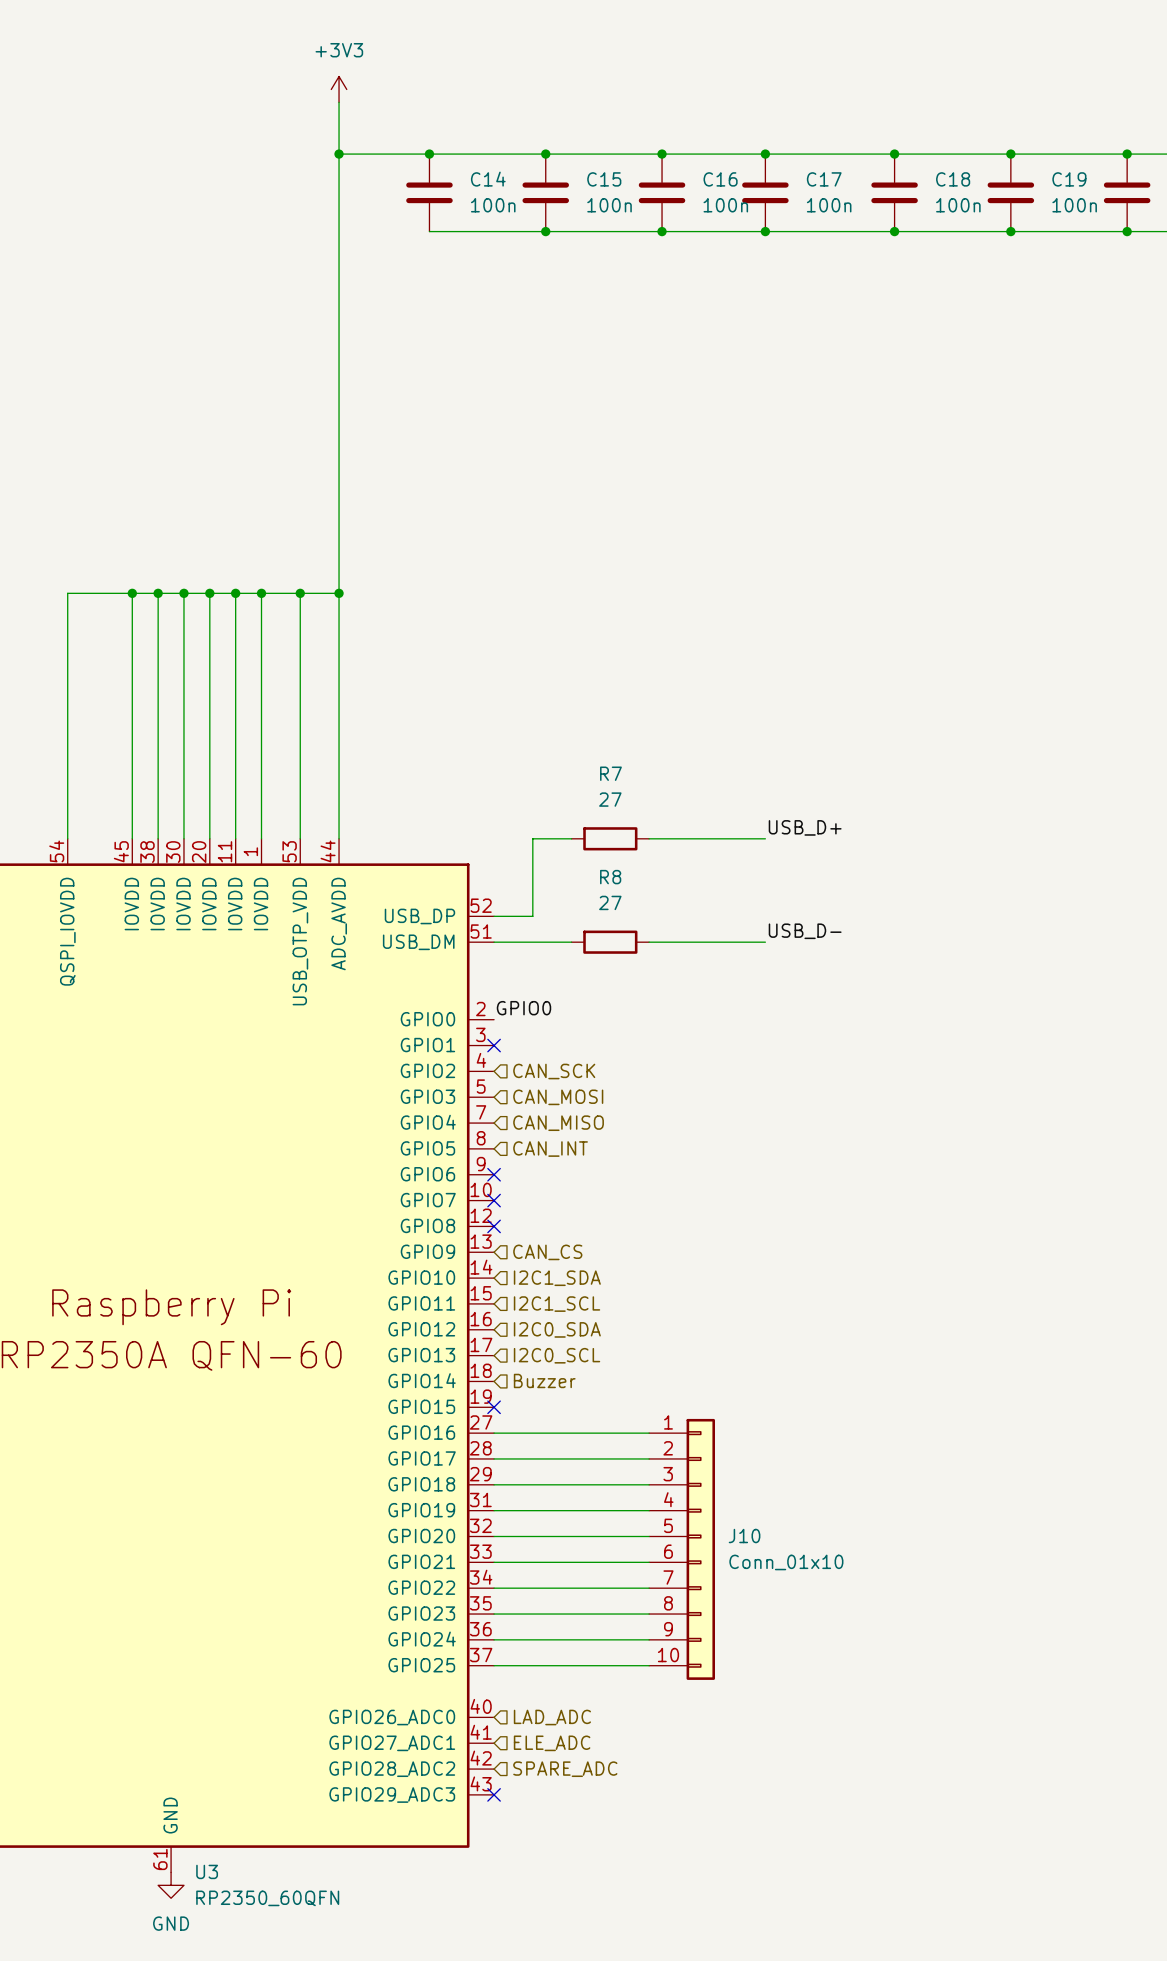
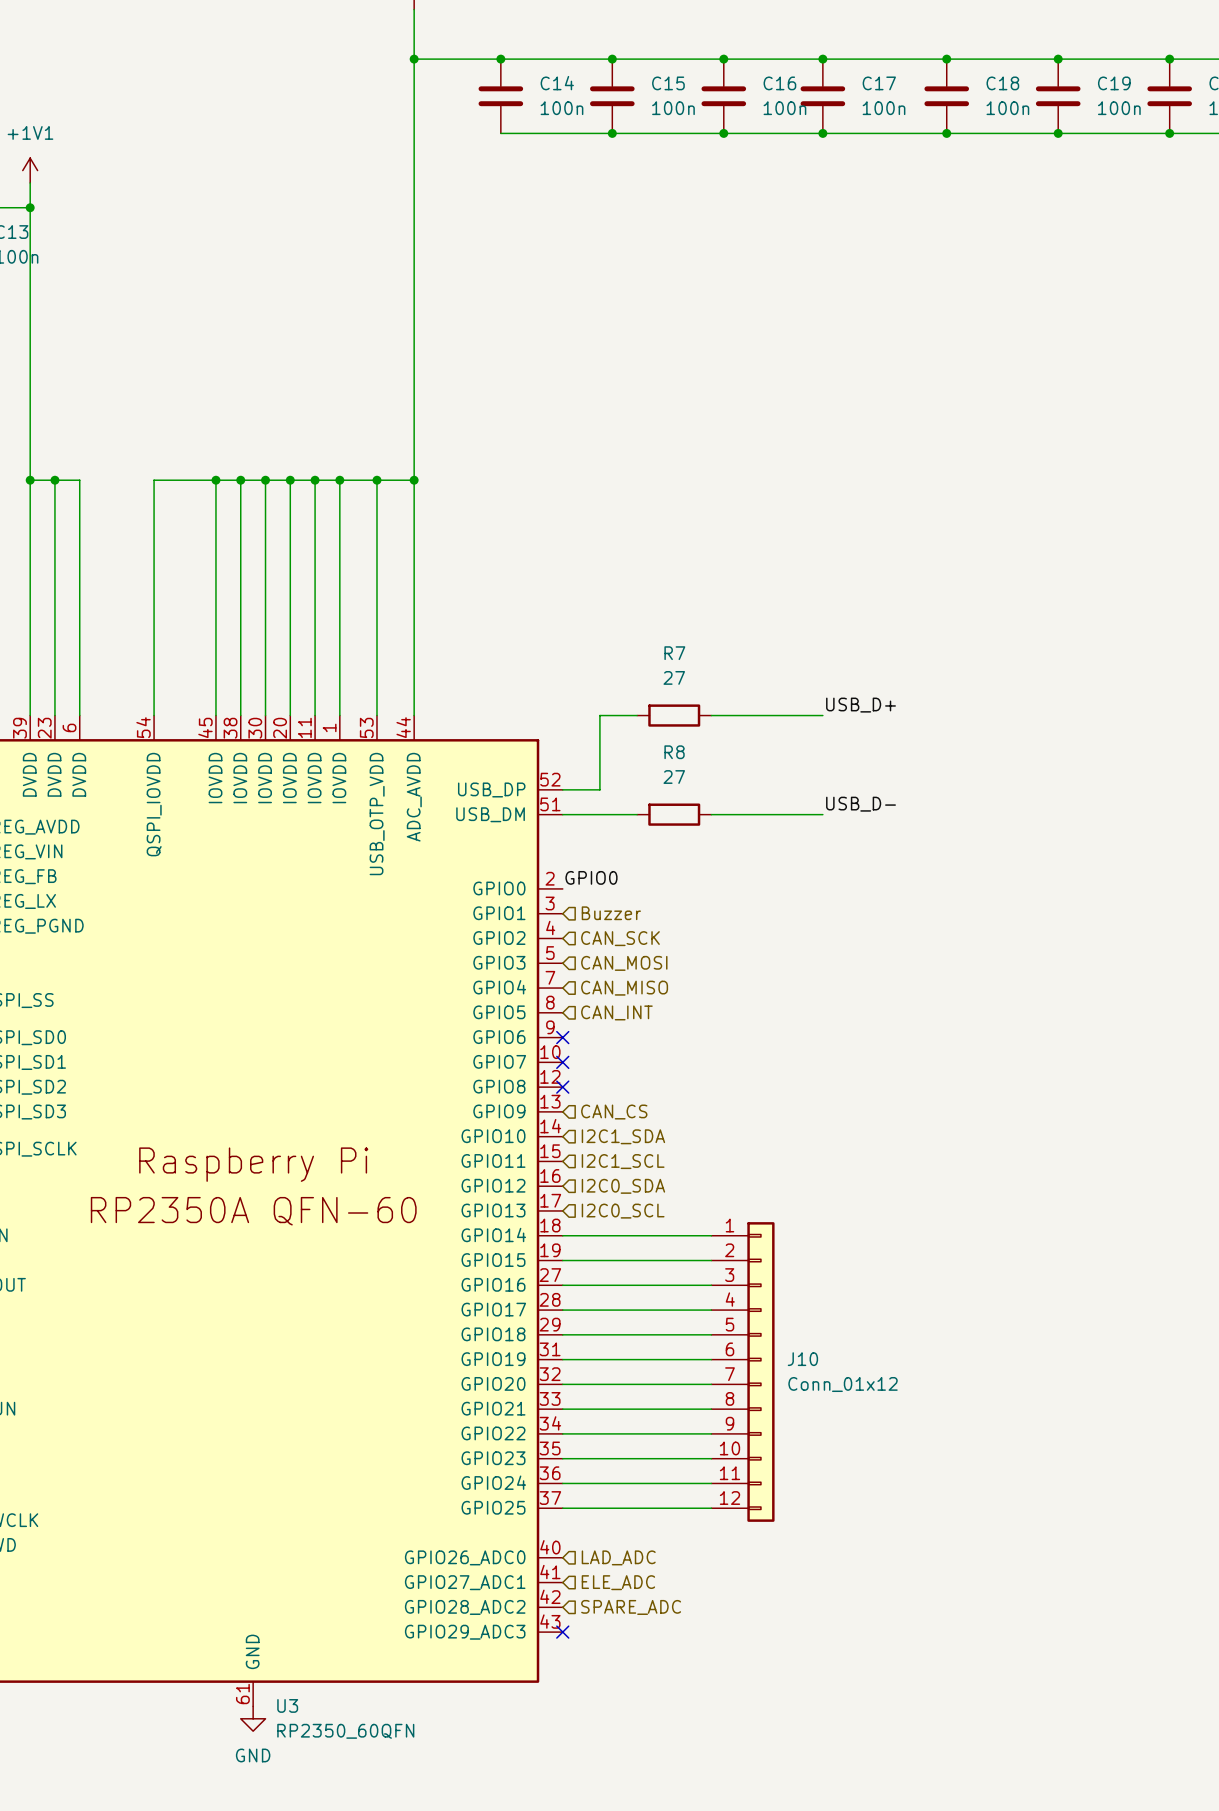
no-connect mark: (494, 1045) -> none
hierarchical label: none -> Buzzer (611, 913)
hierarchical label: Buzzer (544, 1380) -> none
wire: none -> (562, 1235) (711, 1235)
wire: none -> (562, 1260) (711, 1260)
no-connect mark: (494, 1407) -> none
J10 symbol: [649, 1418, 715, 1680] -> [711, 1222, 775, 1522]
J10 value: Conn_01x10 (786, 1562) -> Conn_01x12 (843, 1384)

